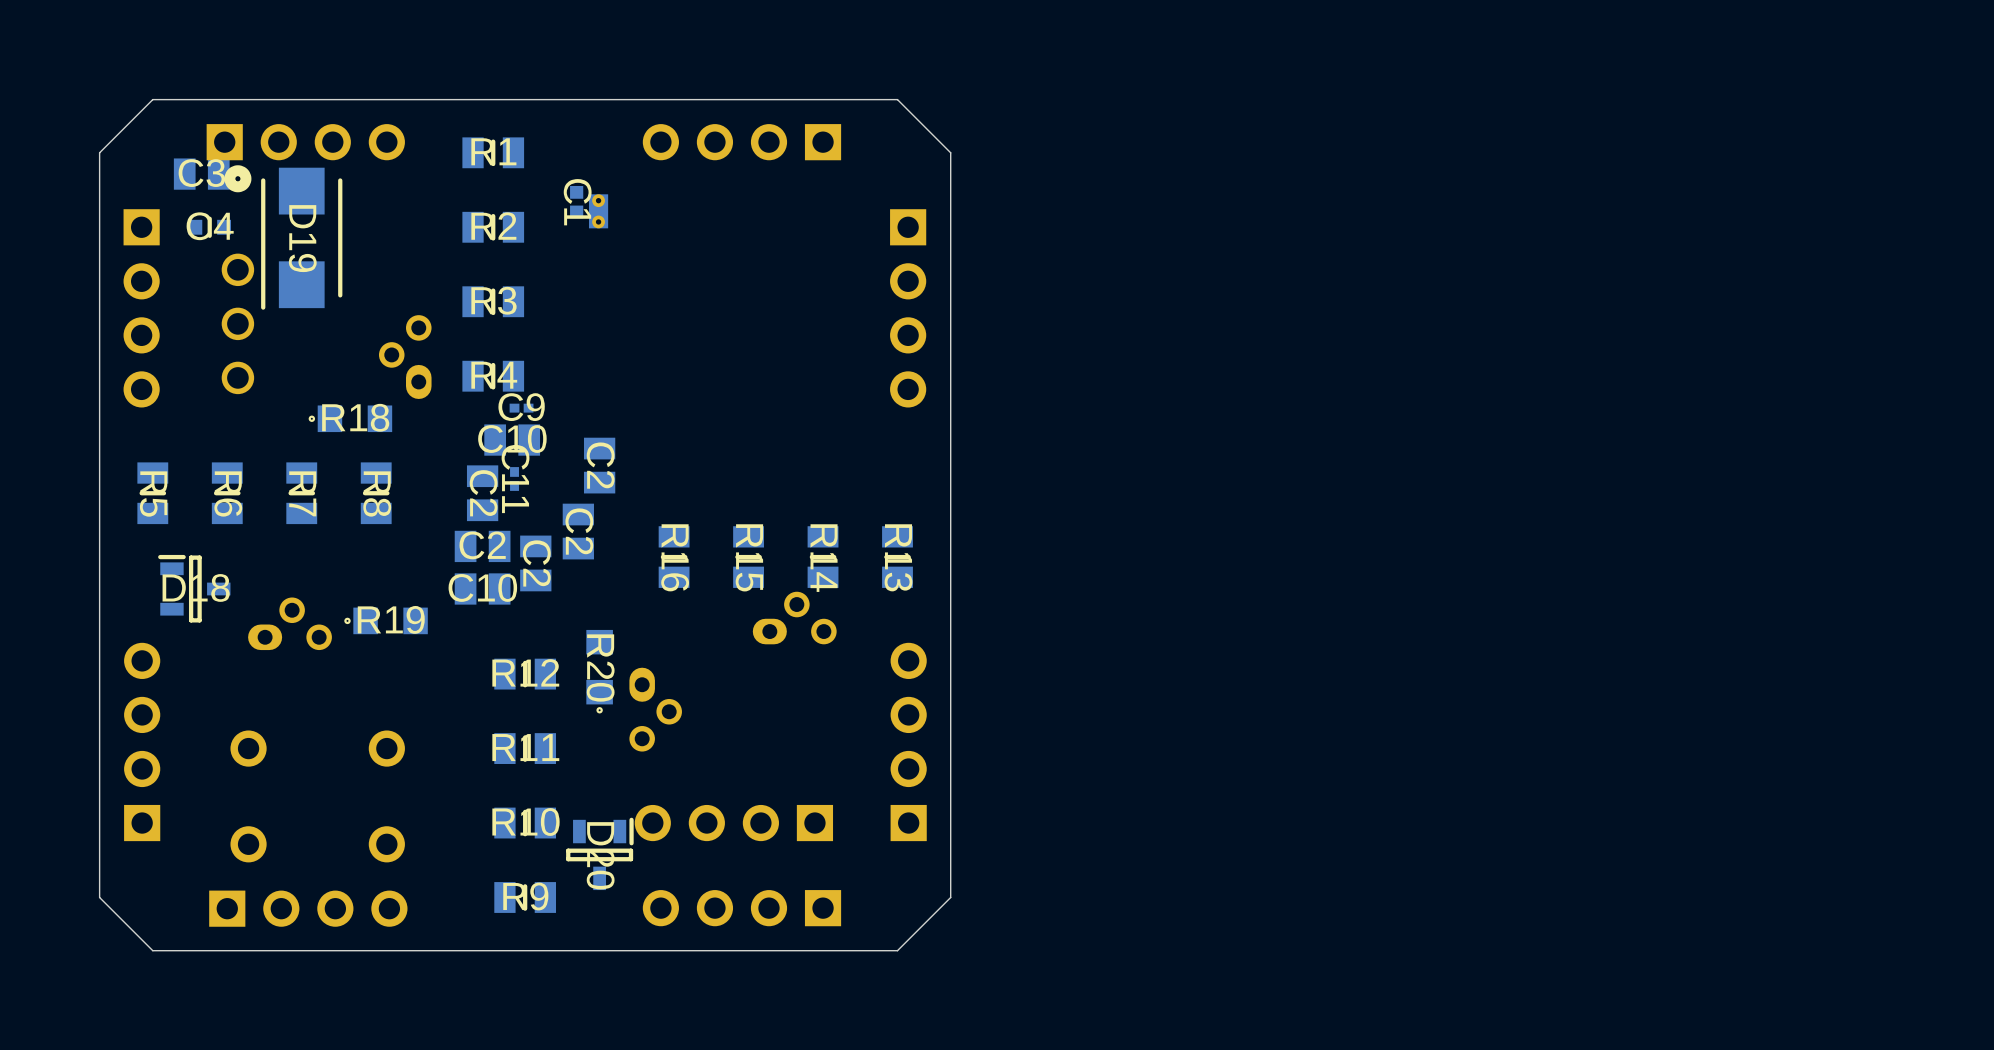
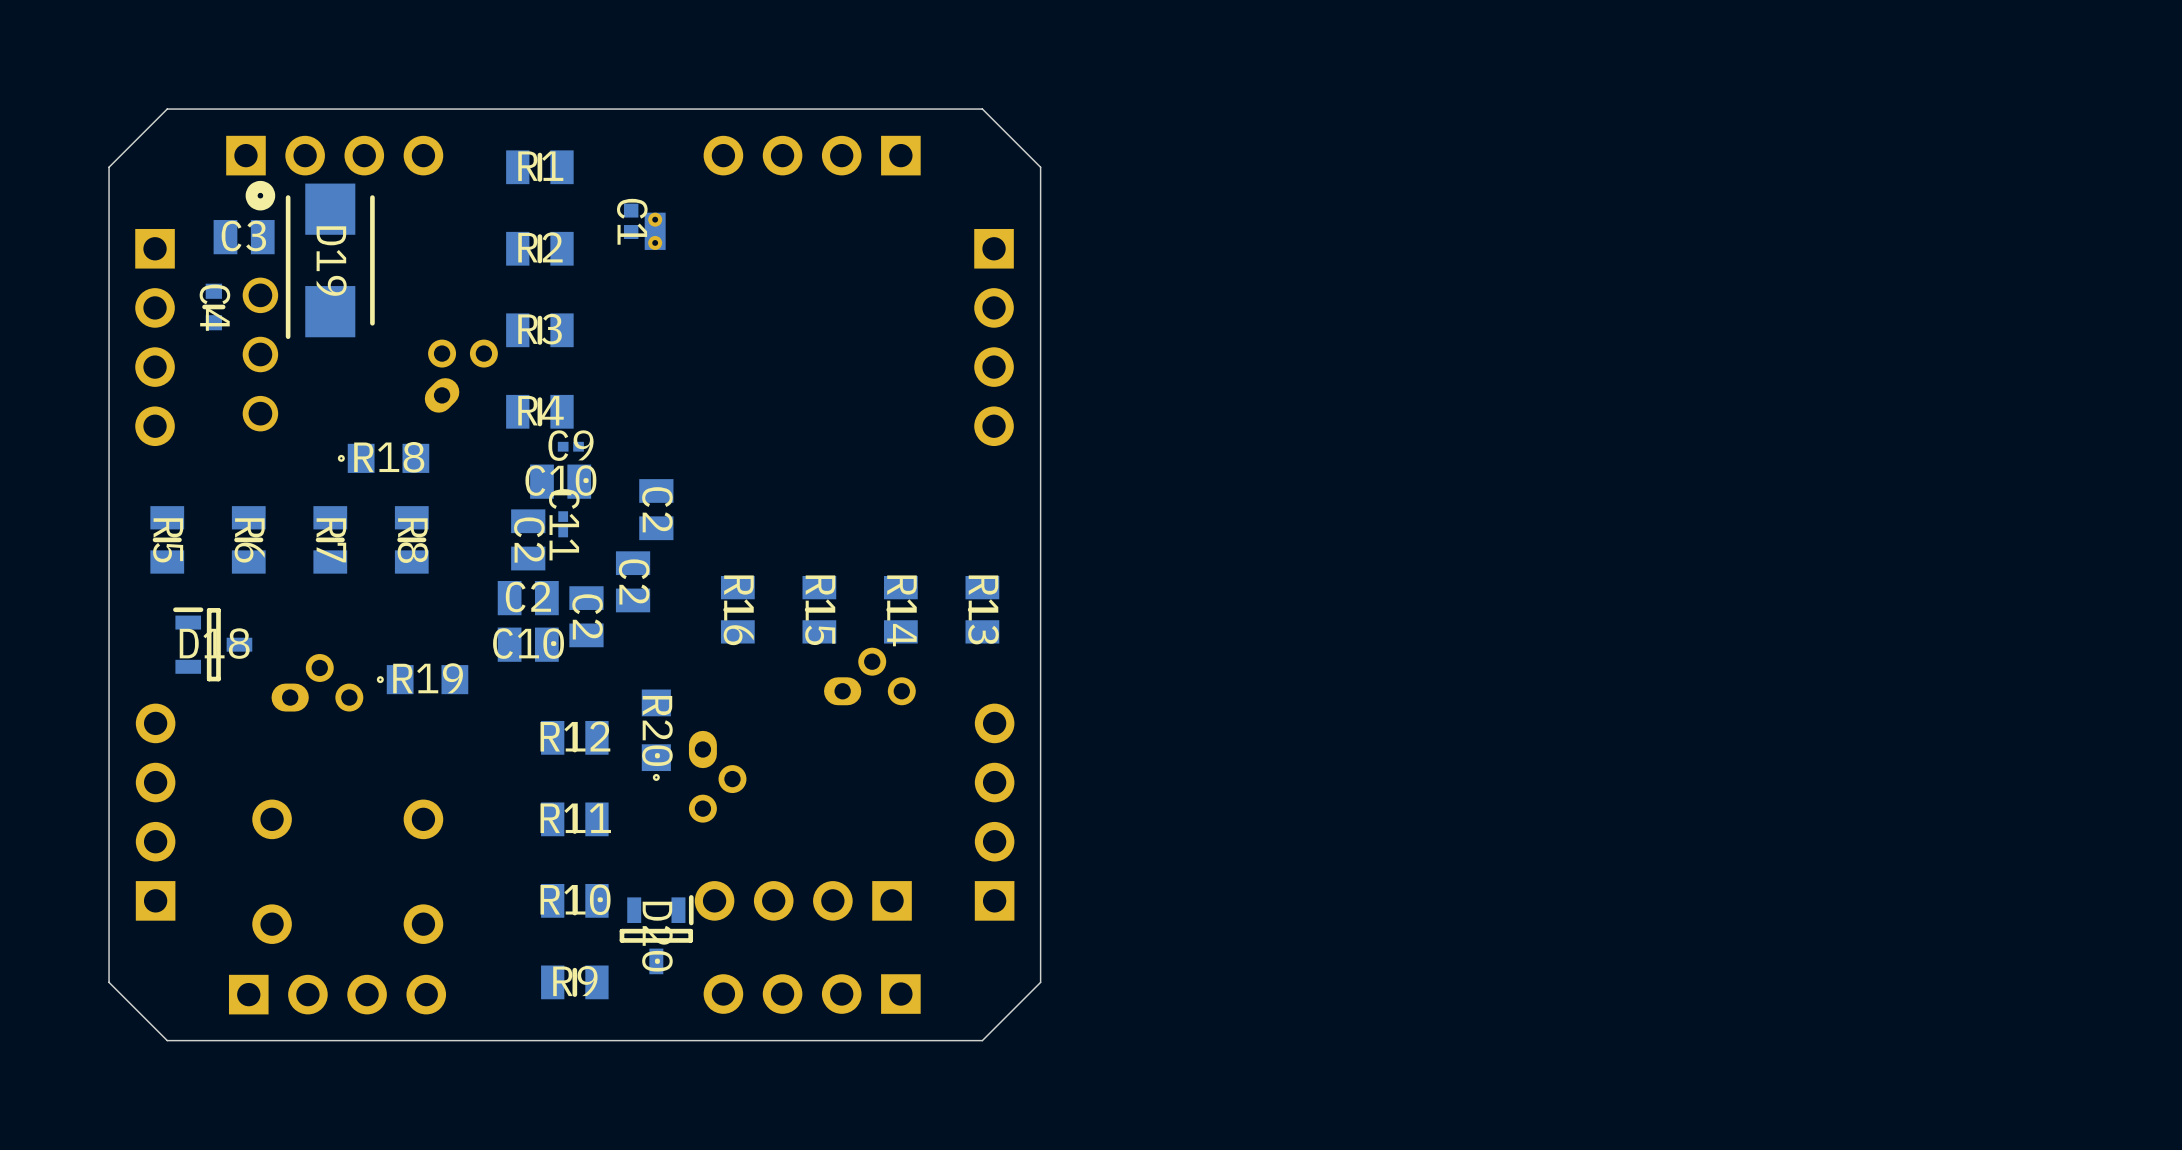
C3 position: (201, 174) -> (244, 237)
C4 rotation: 0° (209, 227) -> 90° clockwise (213, 306)
C4 position: (209, 227) -> (213, 306)
part rotation: 0° (405, 357) -> 45° clockwise (461, 376)

